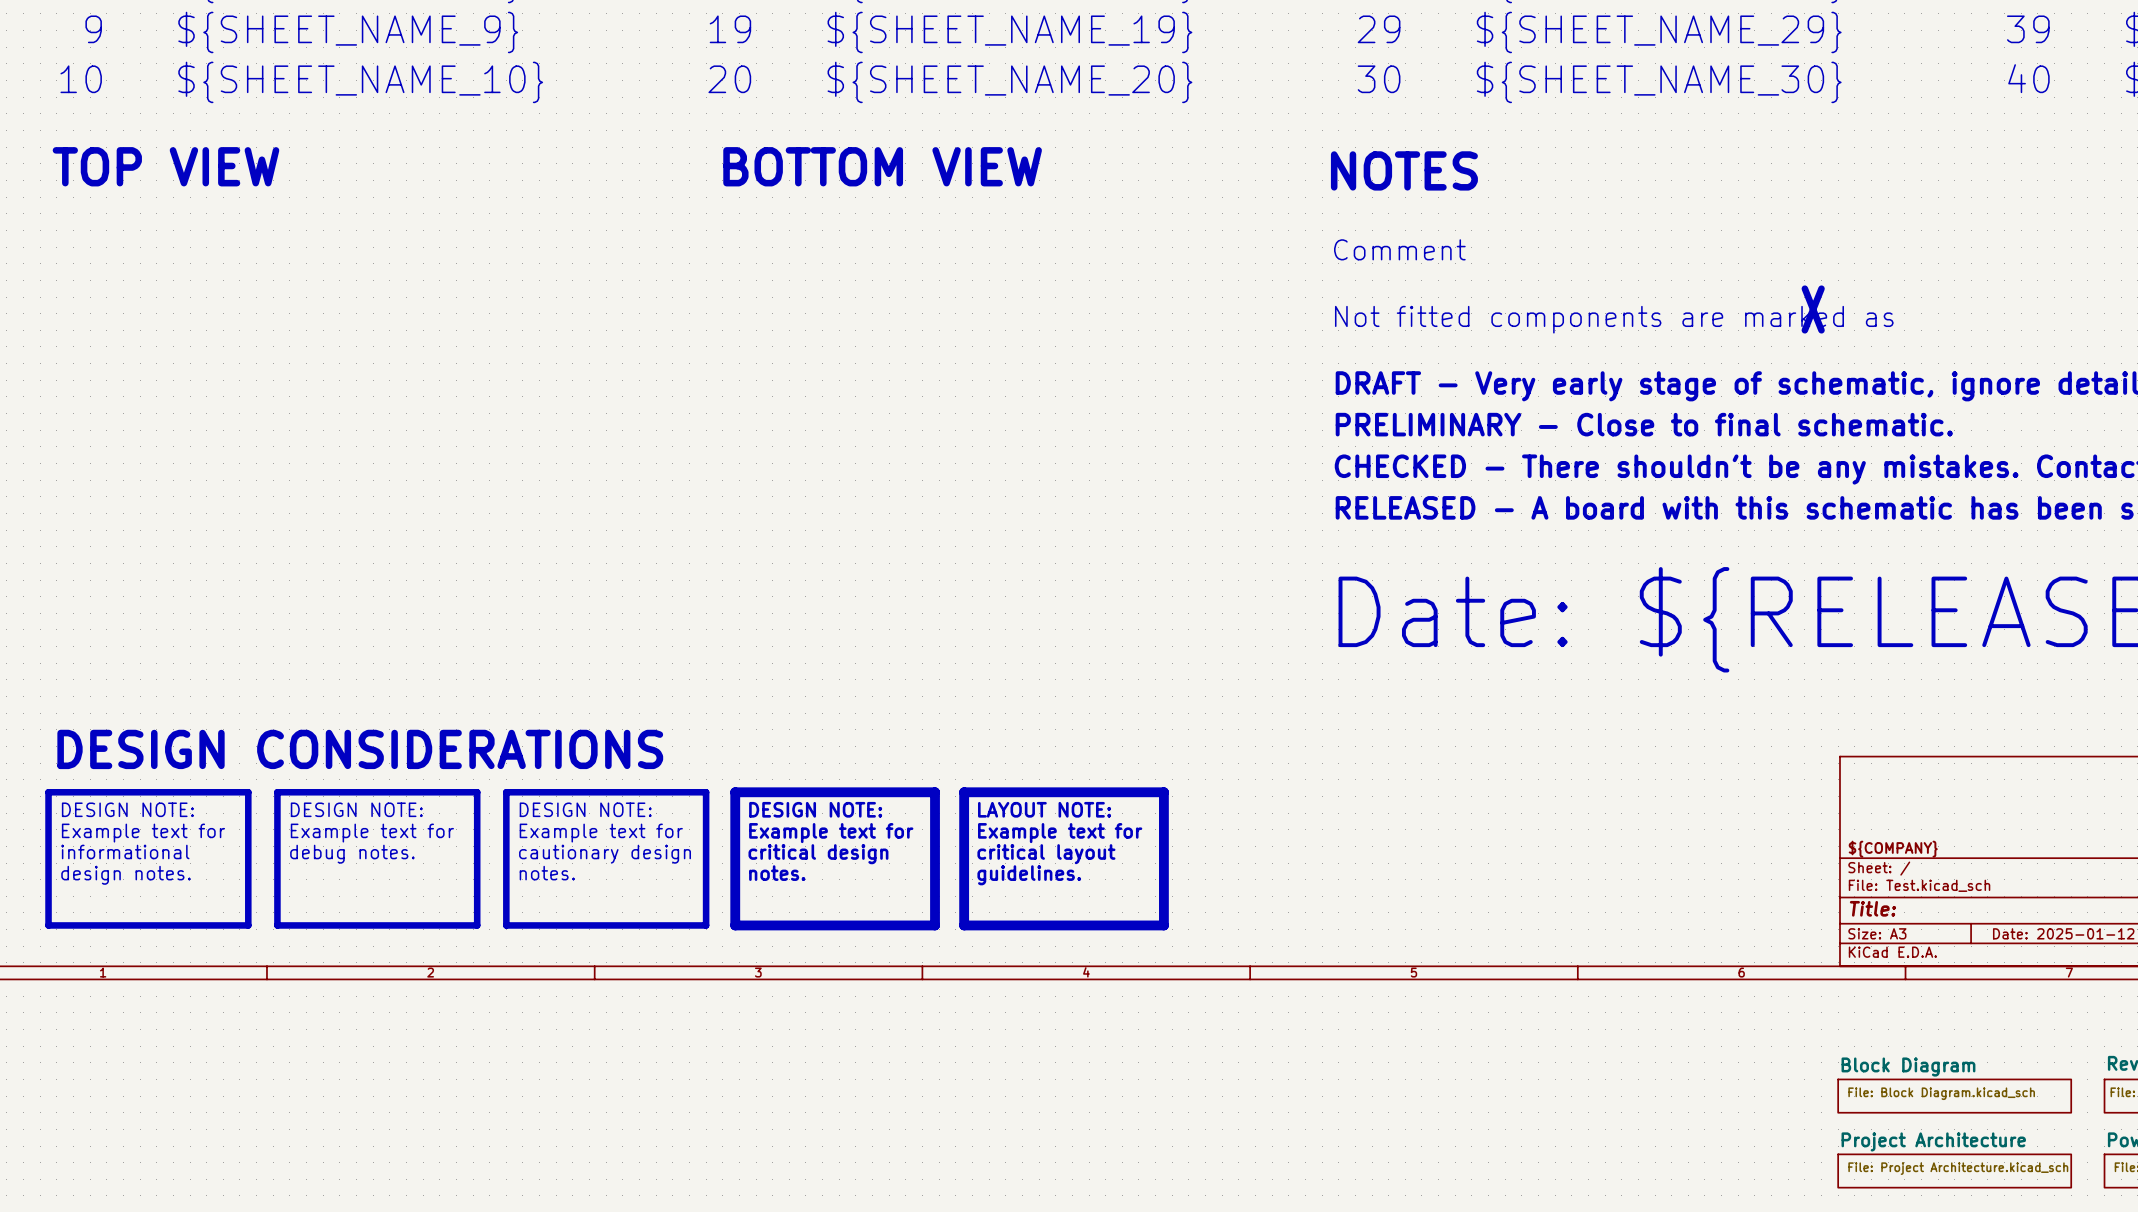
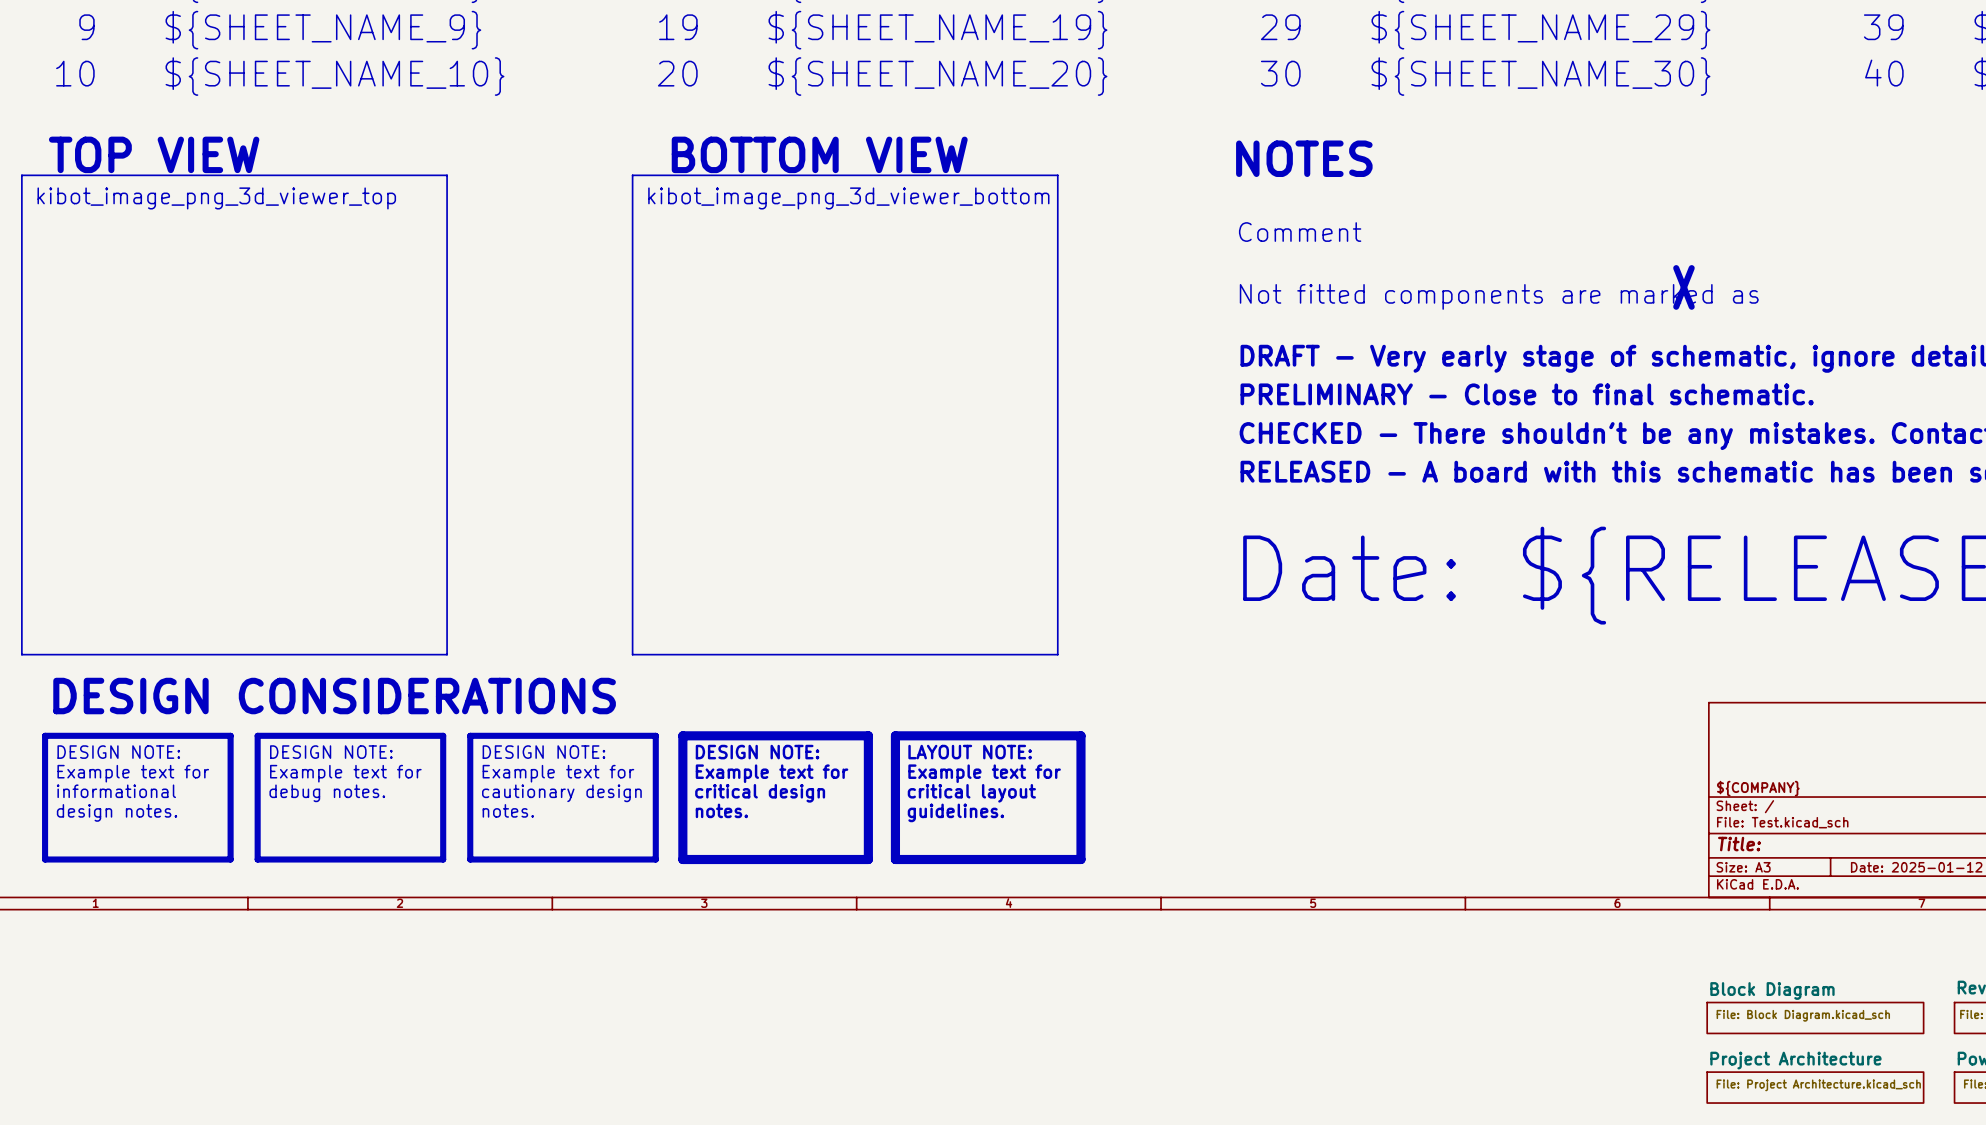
line: none -> (21, 175) (447, 175) (447, 654) (21, 654) (21, 175)
line: none -> (632, 175) (1057, 175) (1057, 654) (632, 654) (632, 175)
text: none -> kibot_image_png_3d_viewer_top (216, 198)
text: none -> kibot_image_png_3d_viewer_bottom (848, 198)

